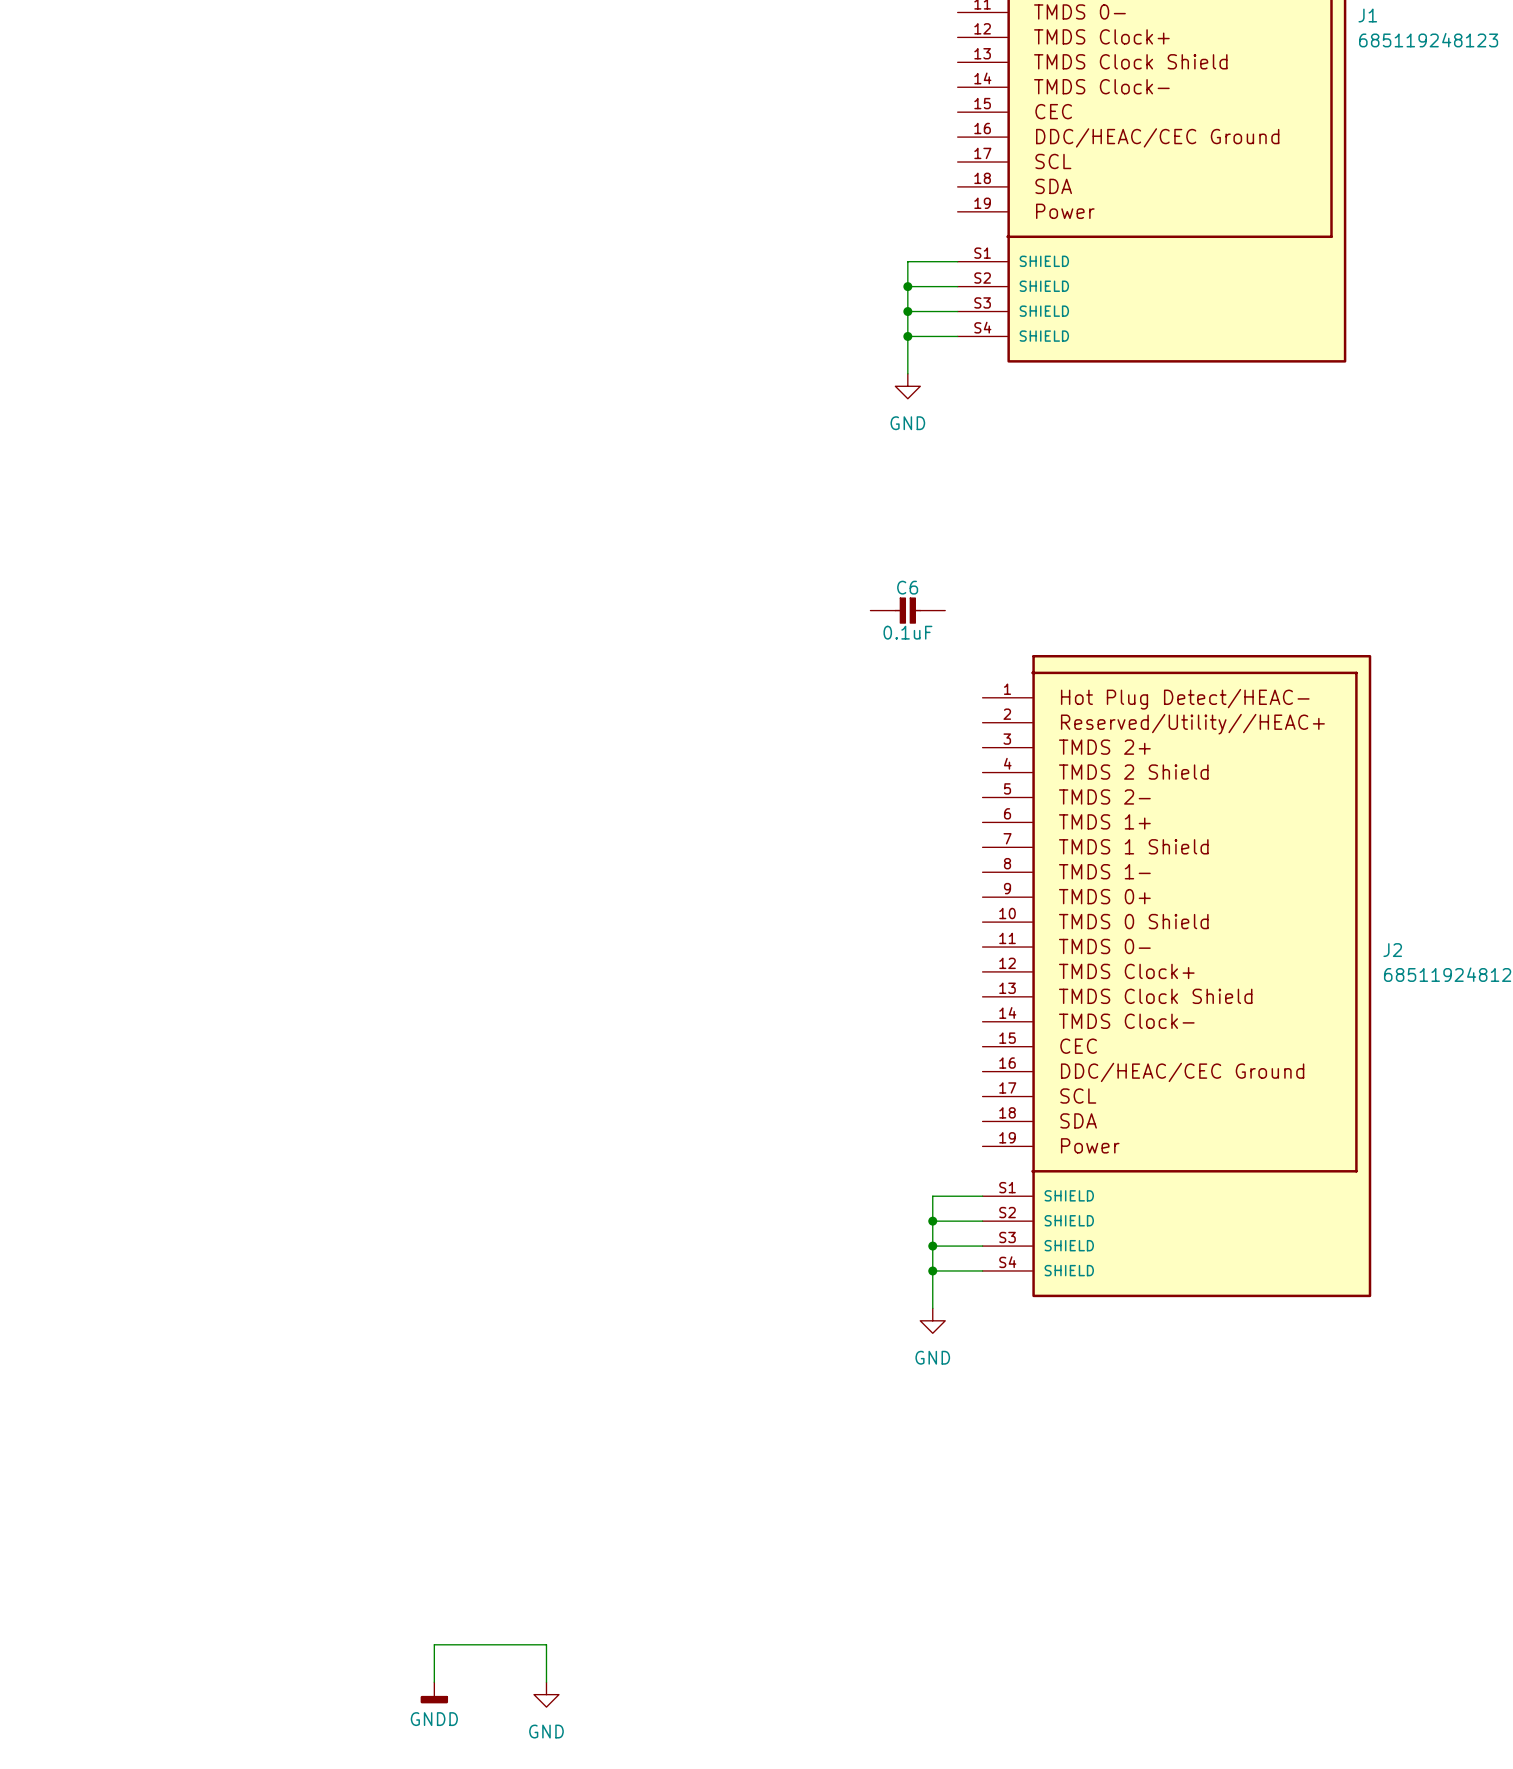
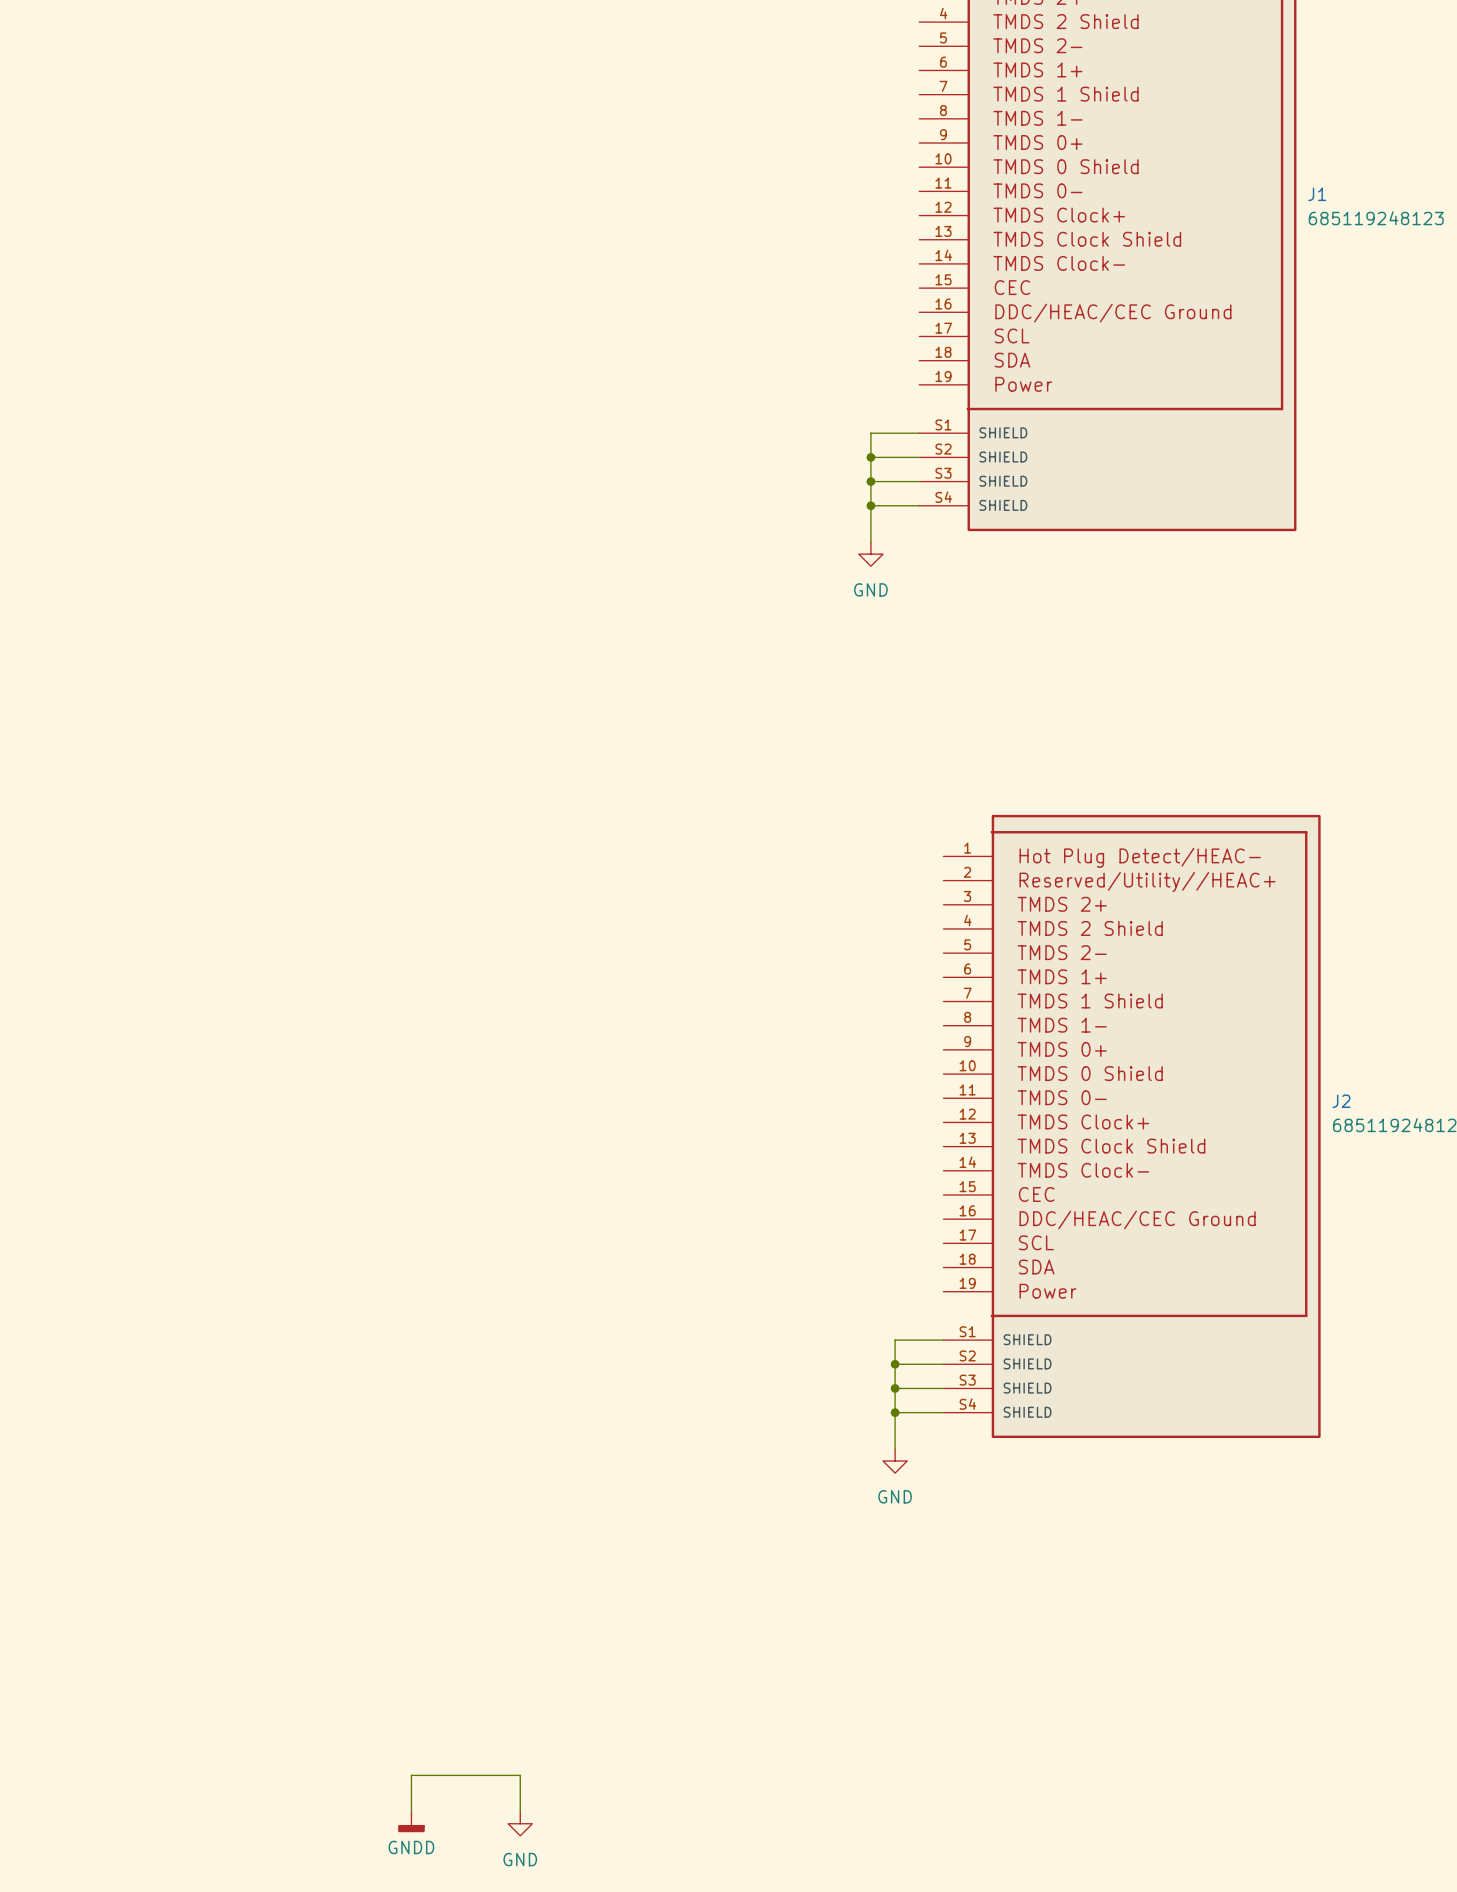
C6: 0.1uF (907, 610) -> none

